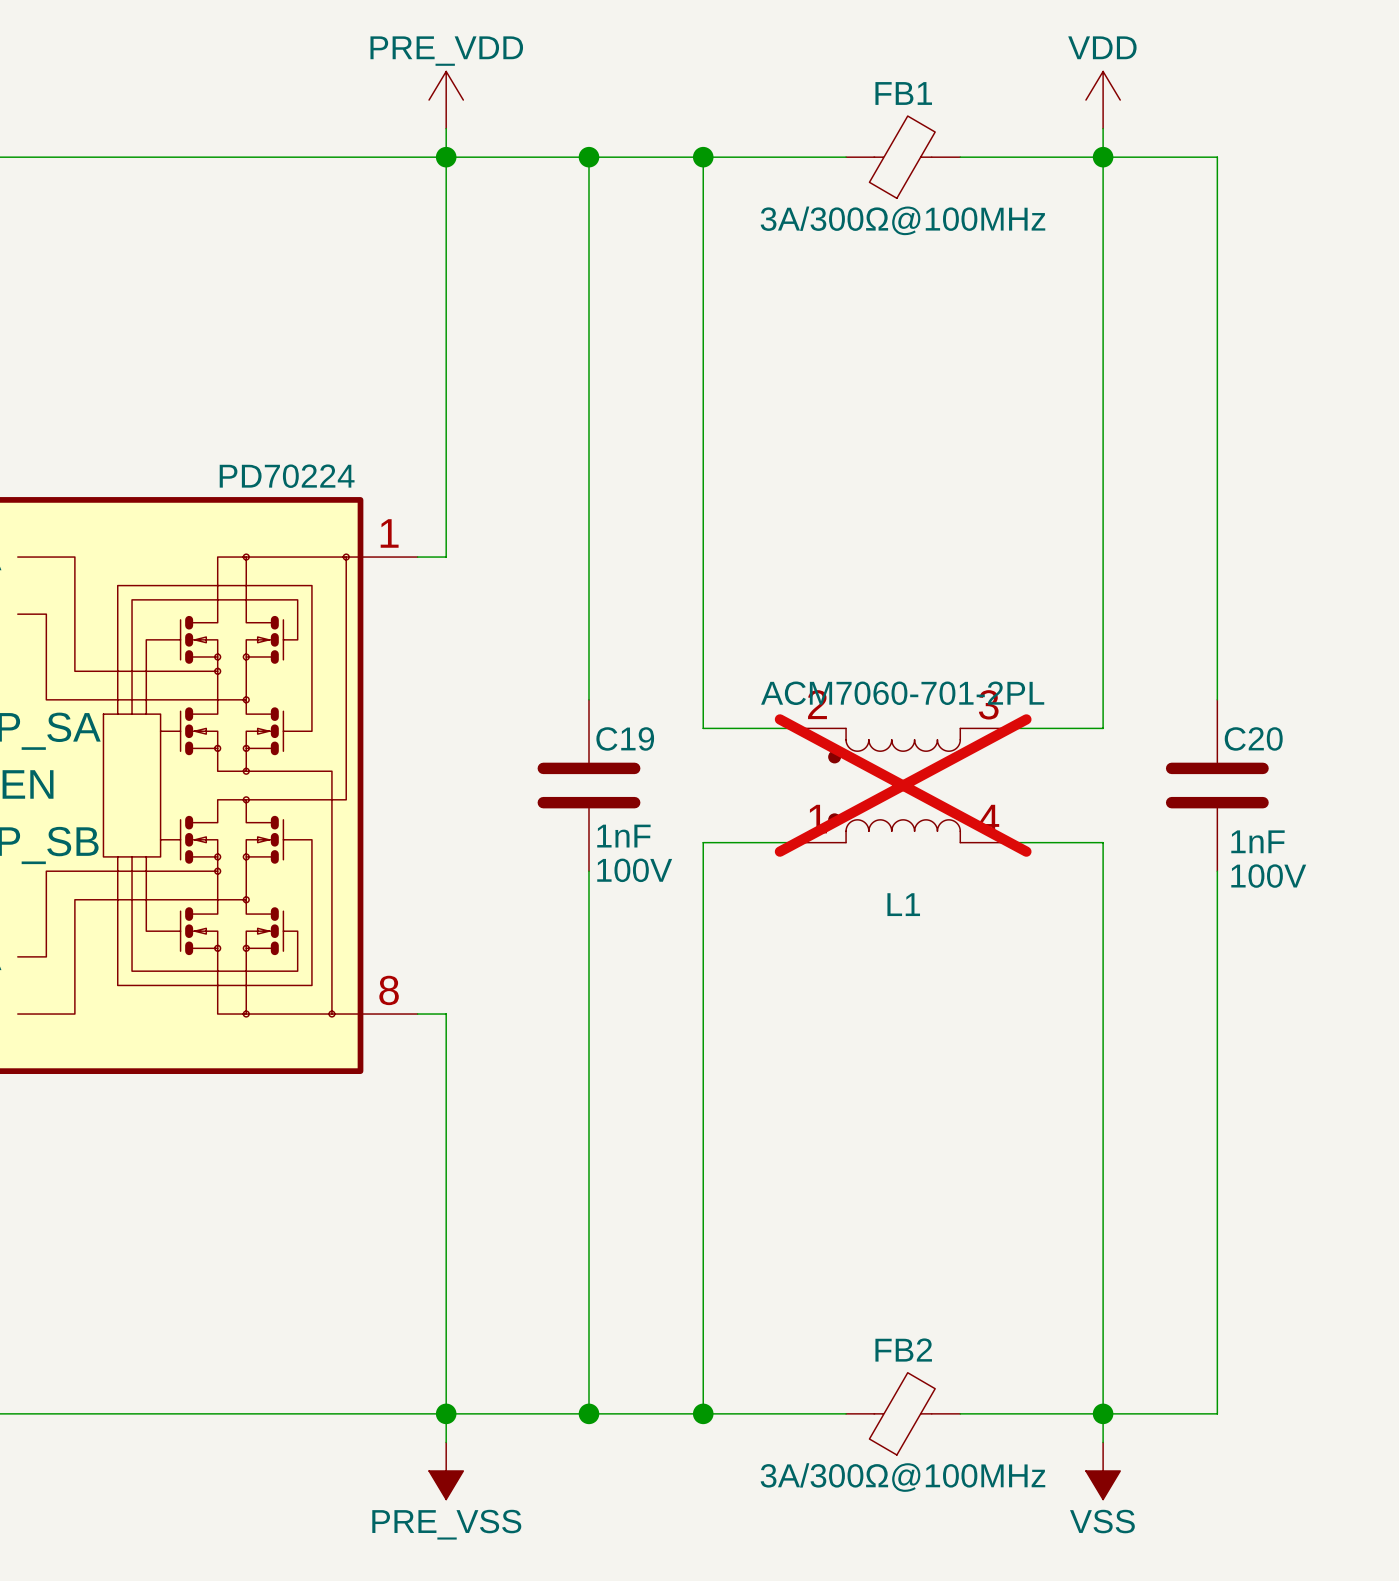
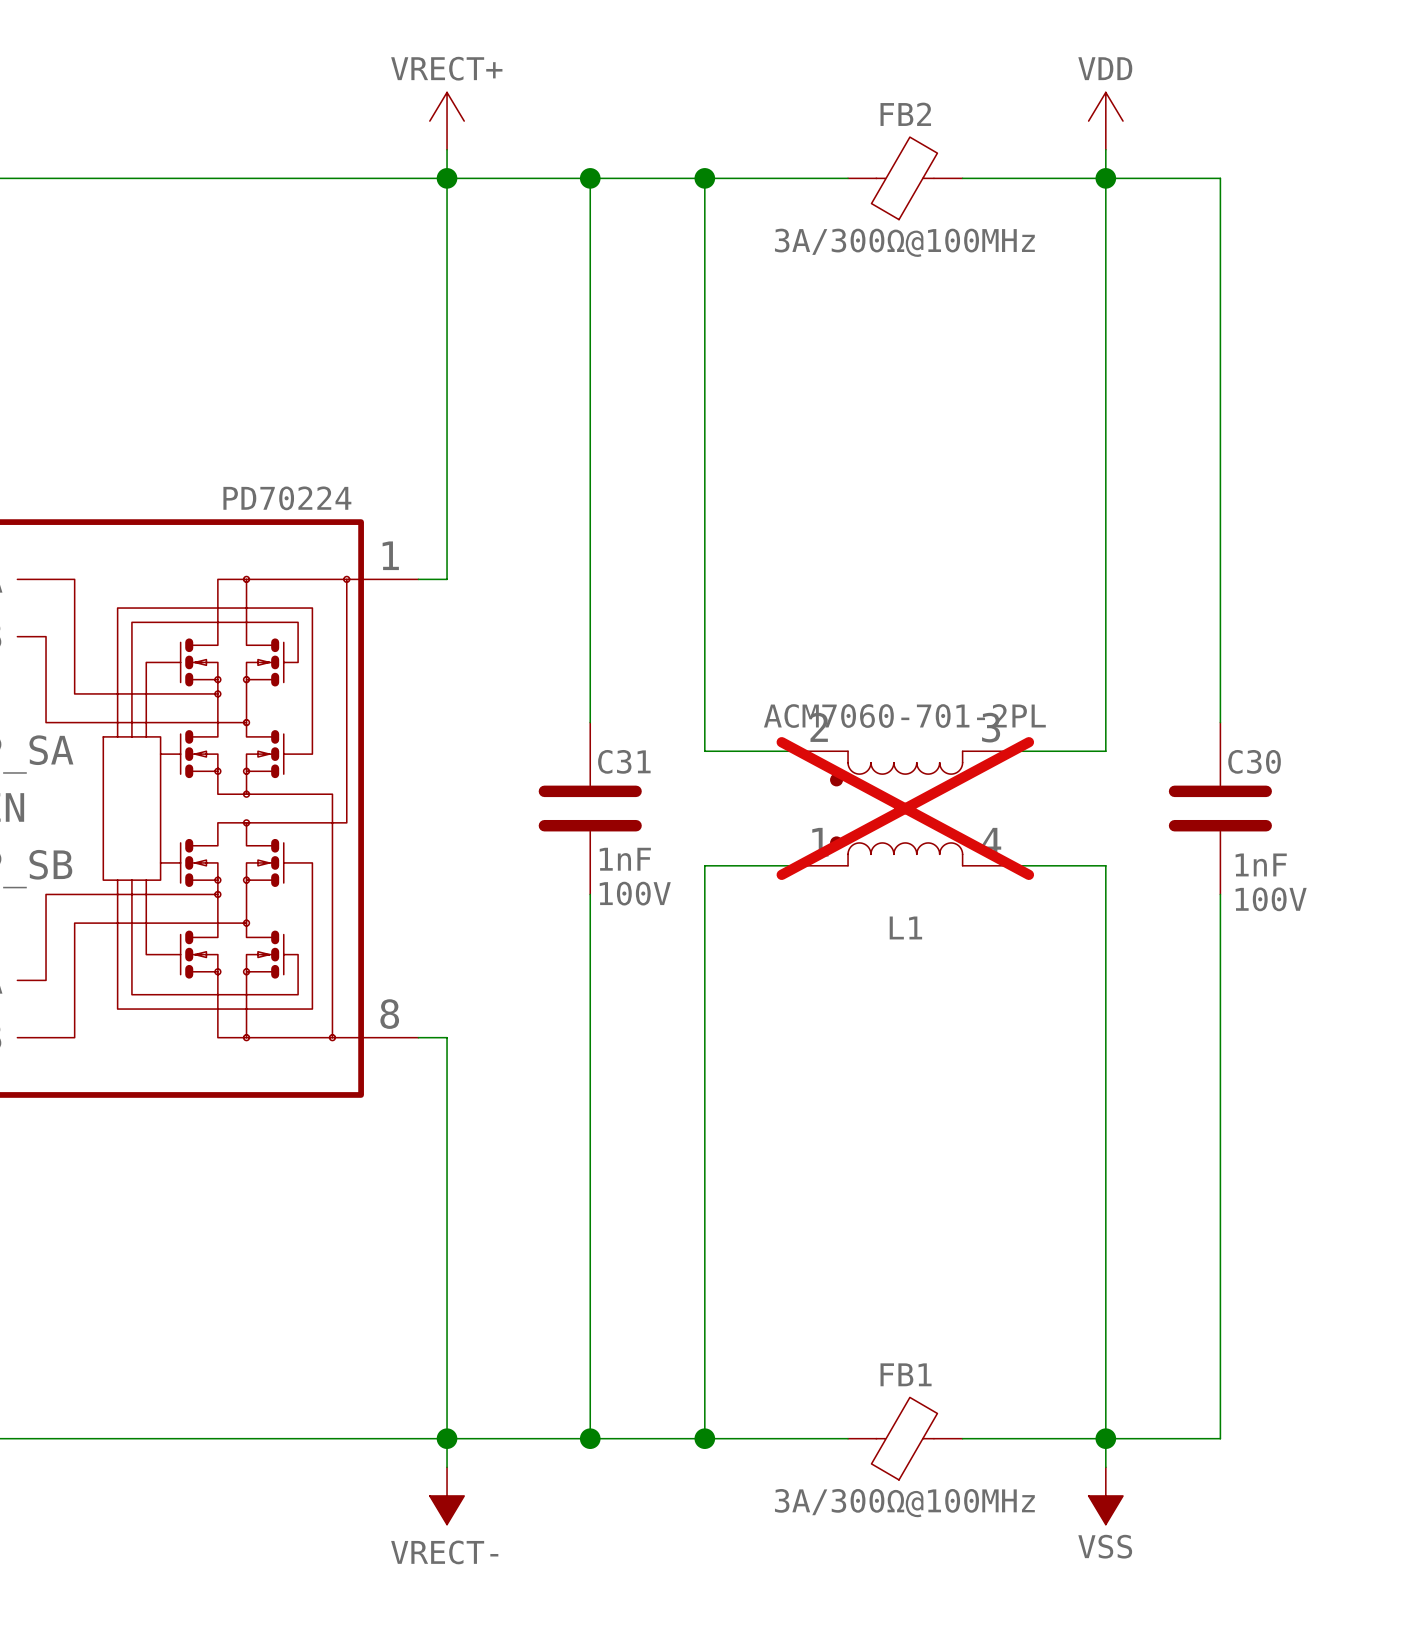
FB1 name: FB1 (903, 93) -> FB2 (905, 114)
power symbol: PRE_VDD (446, 100) -> VRECT+ (447, 121)
C19 name: C19 (625, 738) -> C31 (624, 761)
C20 name: C20 (1253, 738) -> C30 (1254, 761)
FB2 name: FB2 (903, 1350) -> FB1 (906, 1374)
power symbol: PRE_VSS (446, 1470) -> VRECT- (447, 1495)

